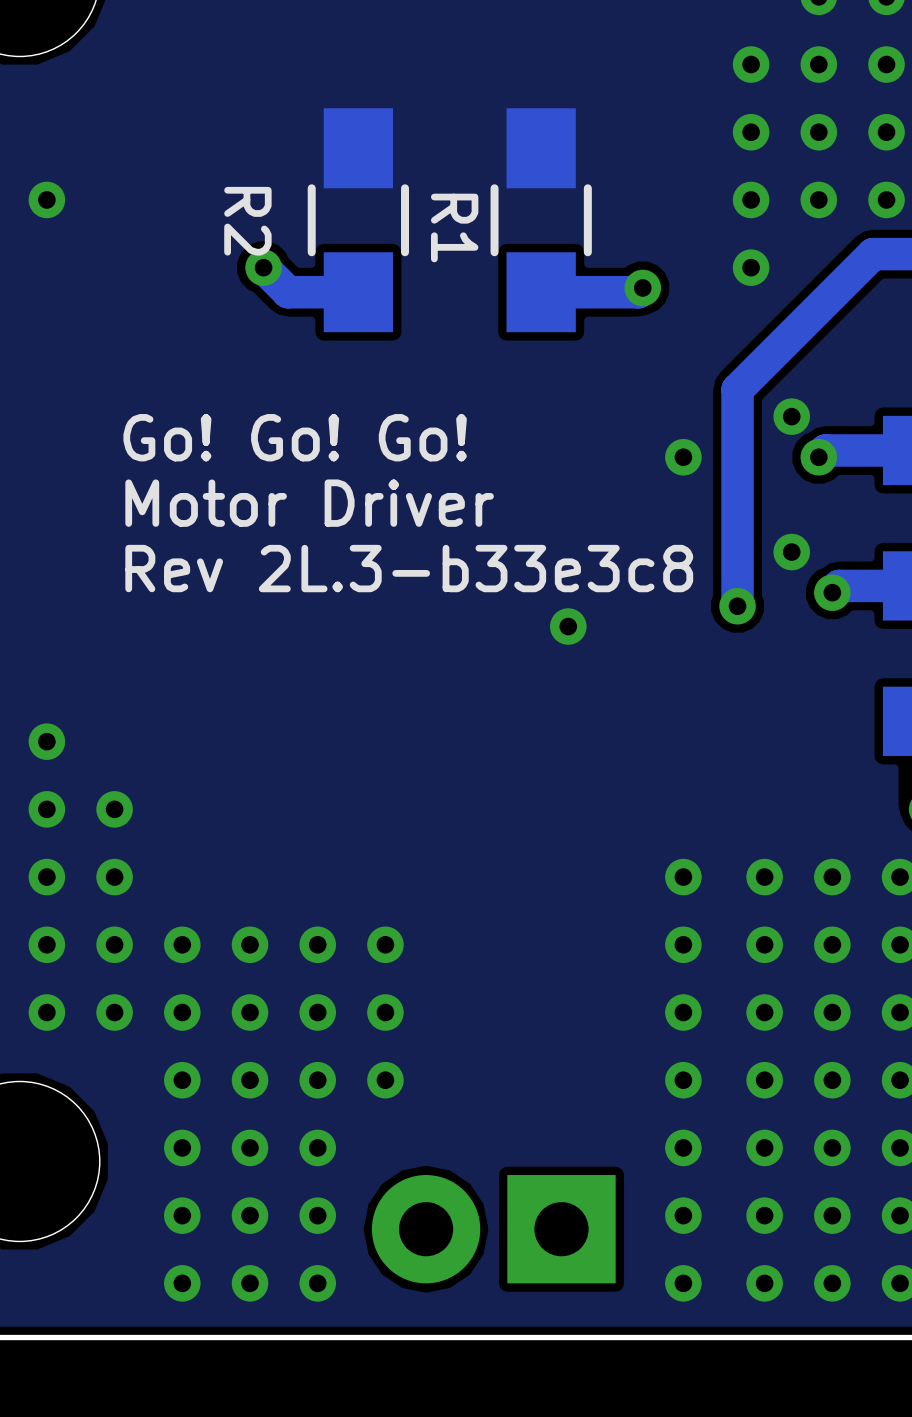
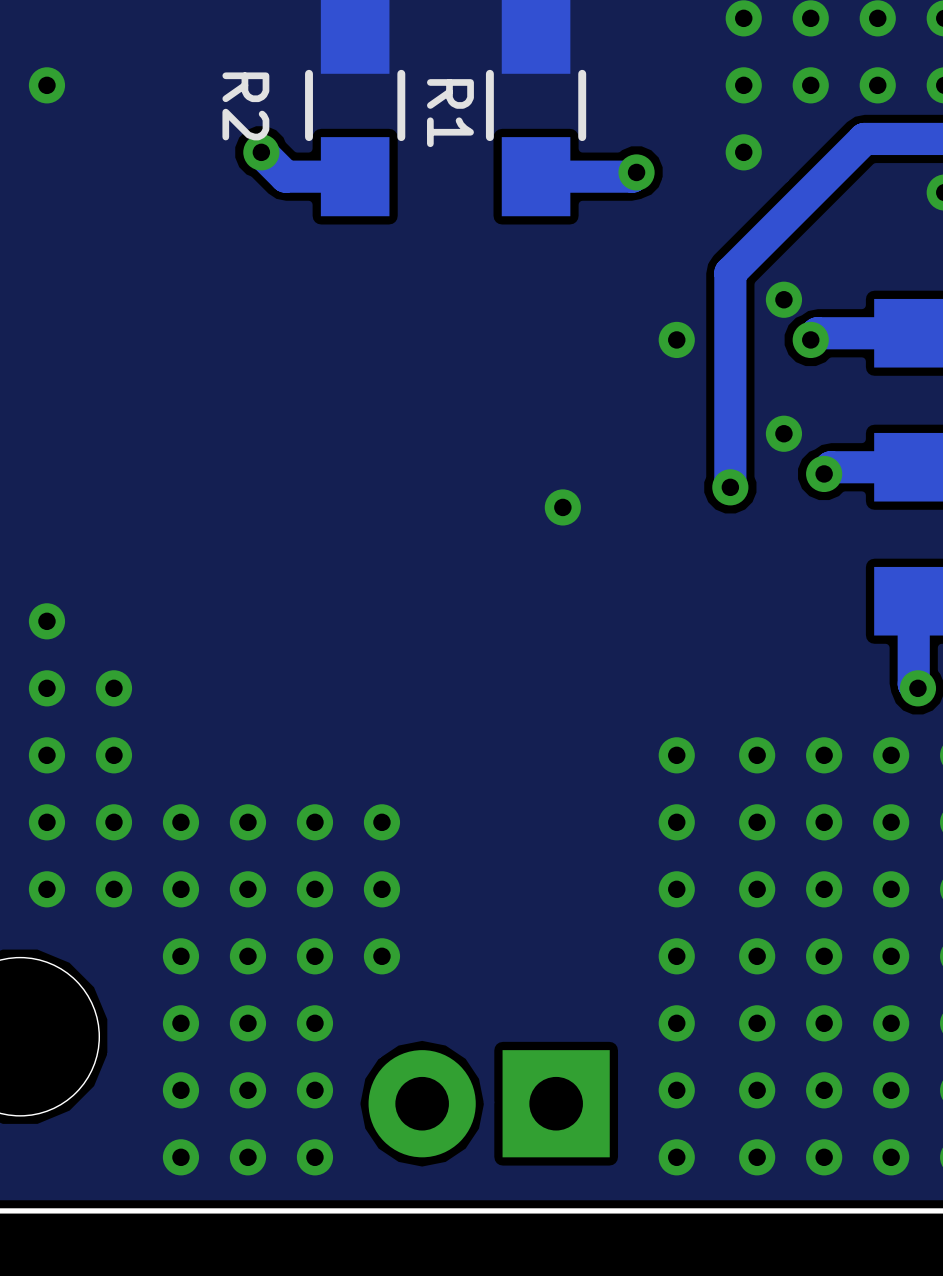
text: Go! Go! Go! (295, 437) -> none
text: Motor Driver (309, 503) -> none
text: Rev 2L.3-b33e3c8 (409, 568) -> none

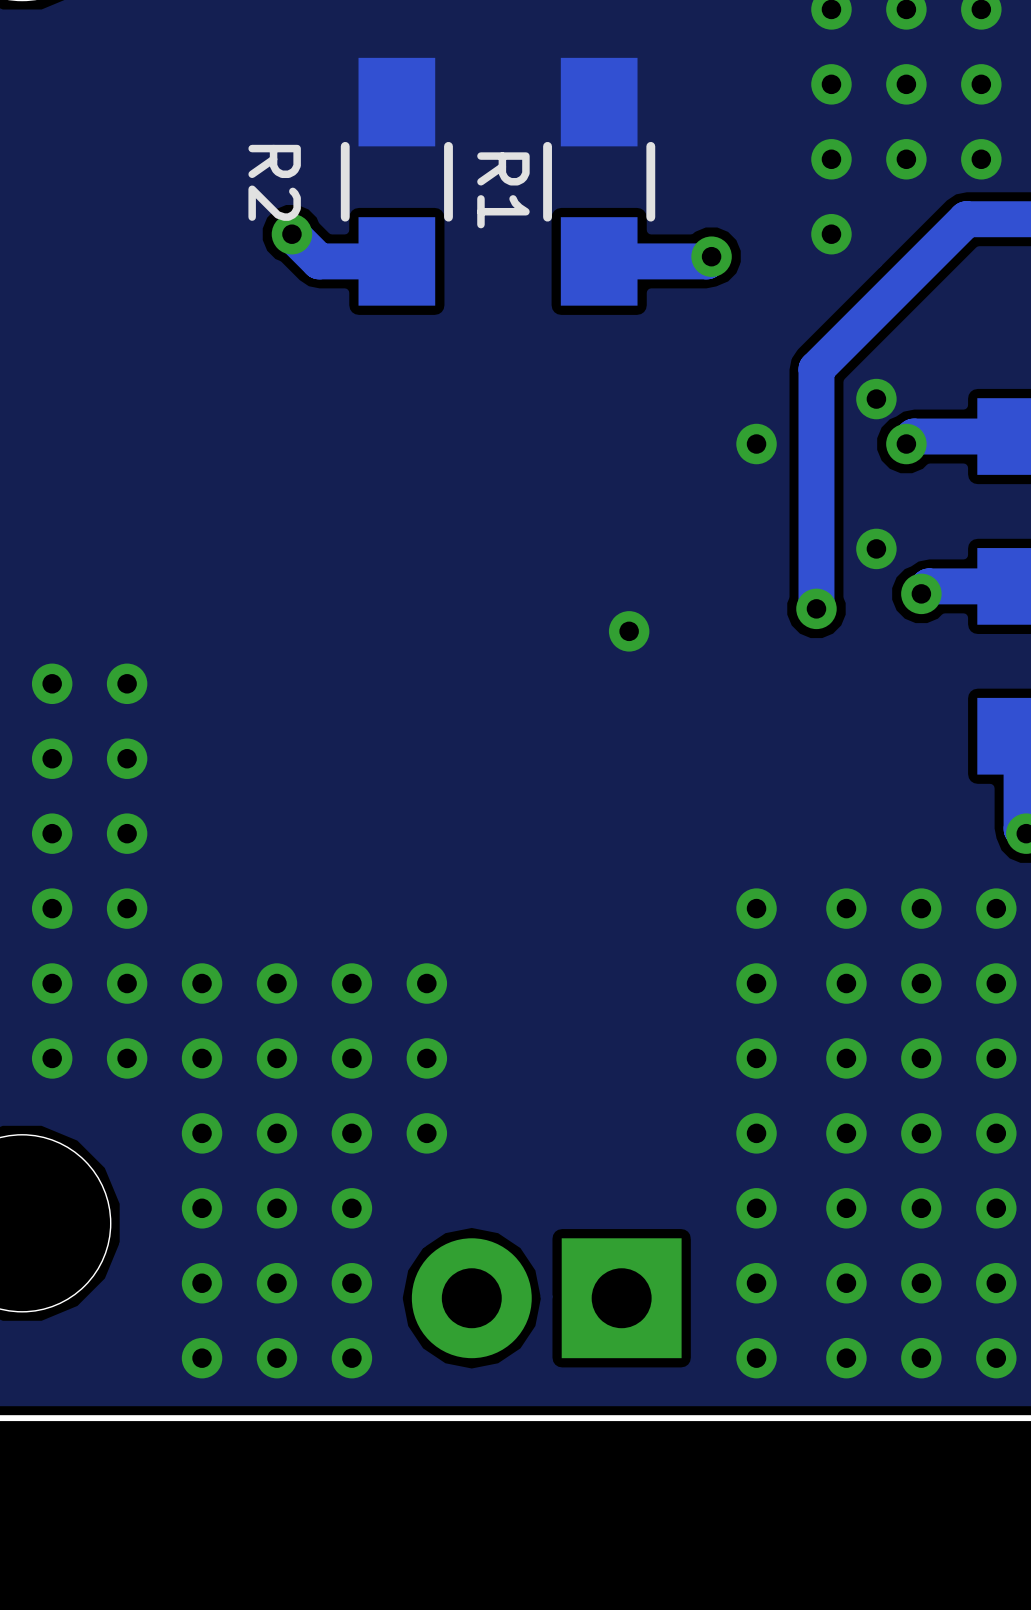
part: (46, 85) -> none
part: none -> (52, 683)
part: none -> (127, 683)
part: none -> (127, 758)

